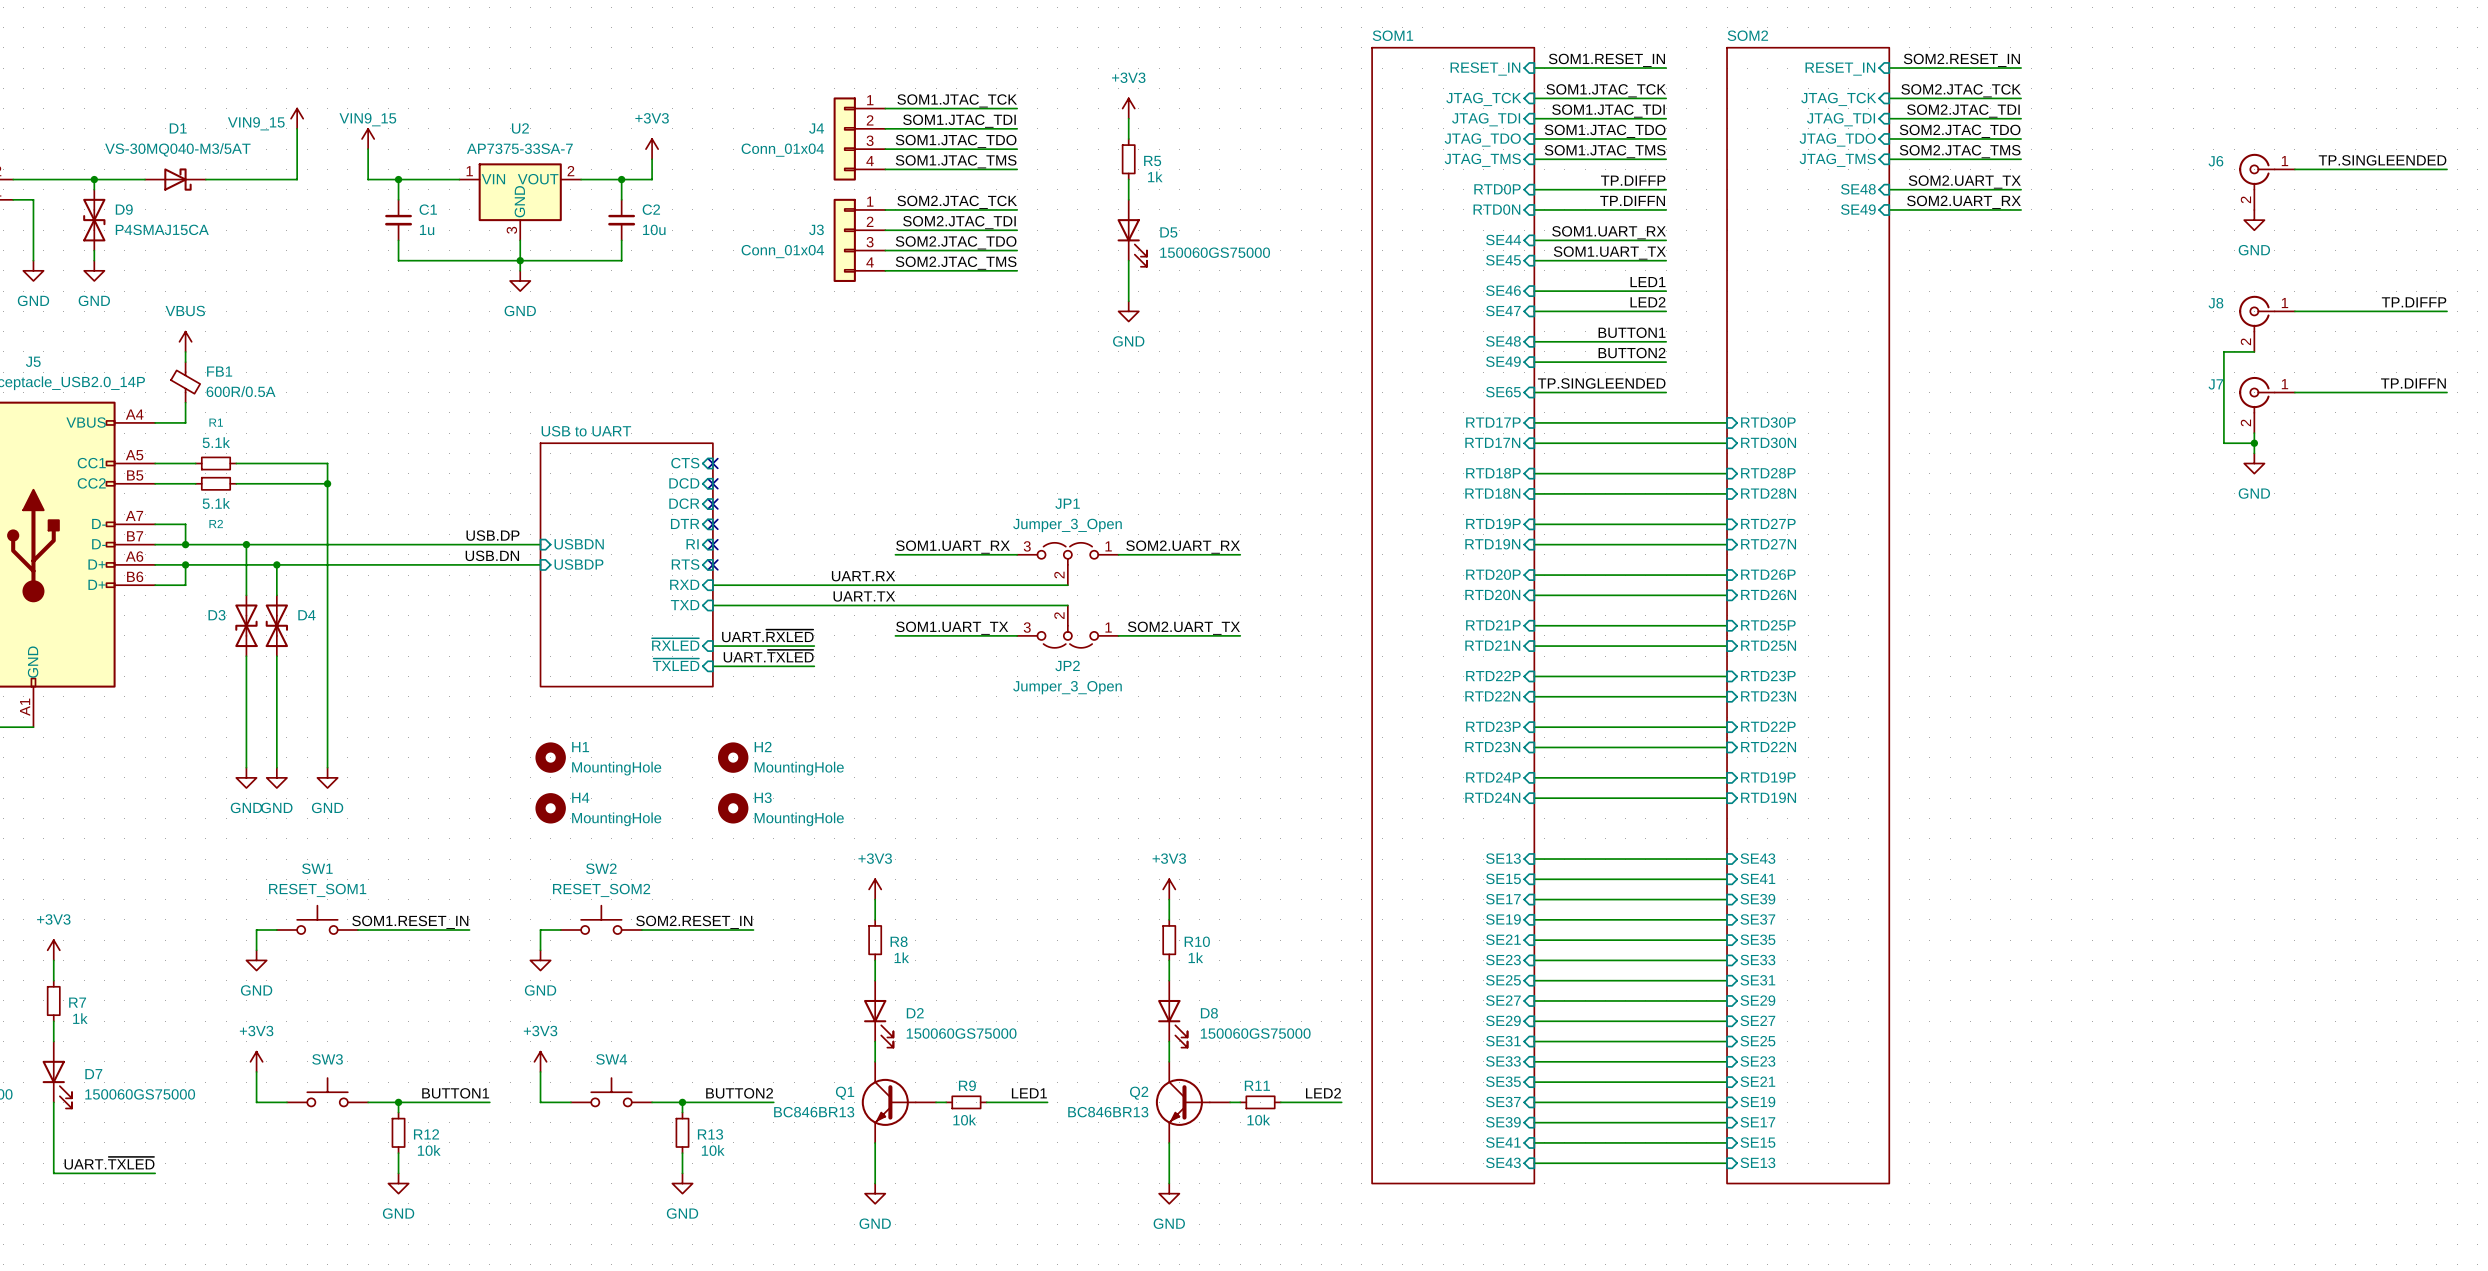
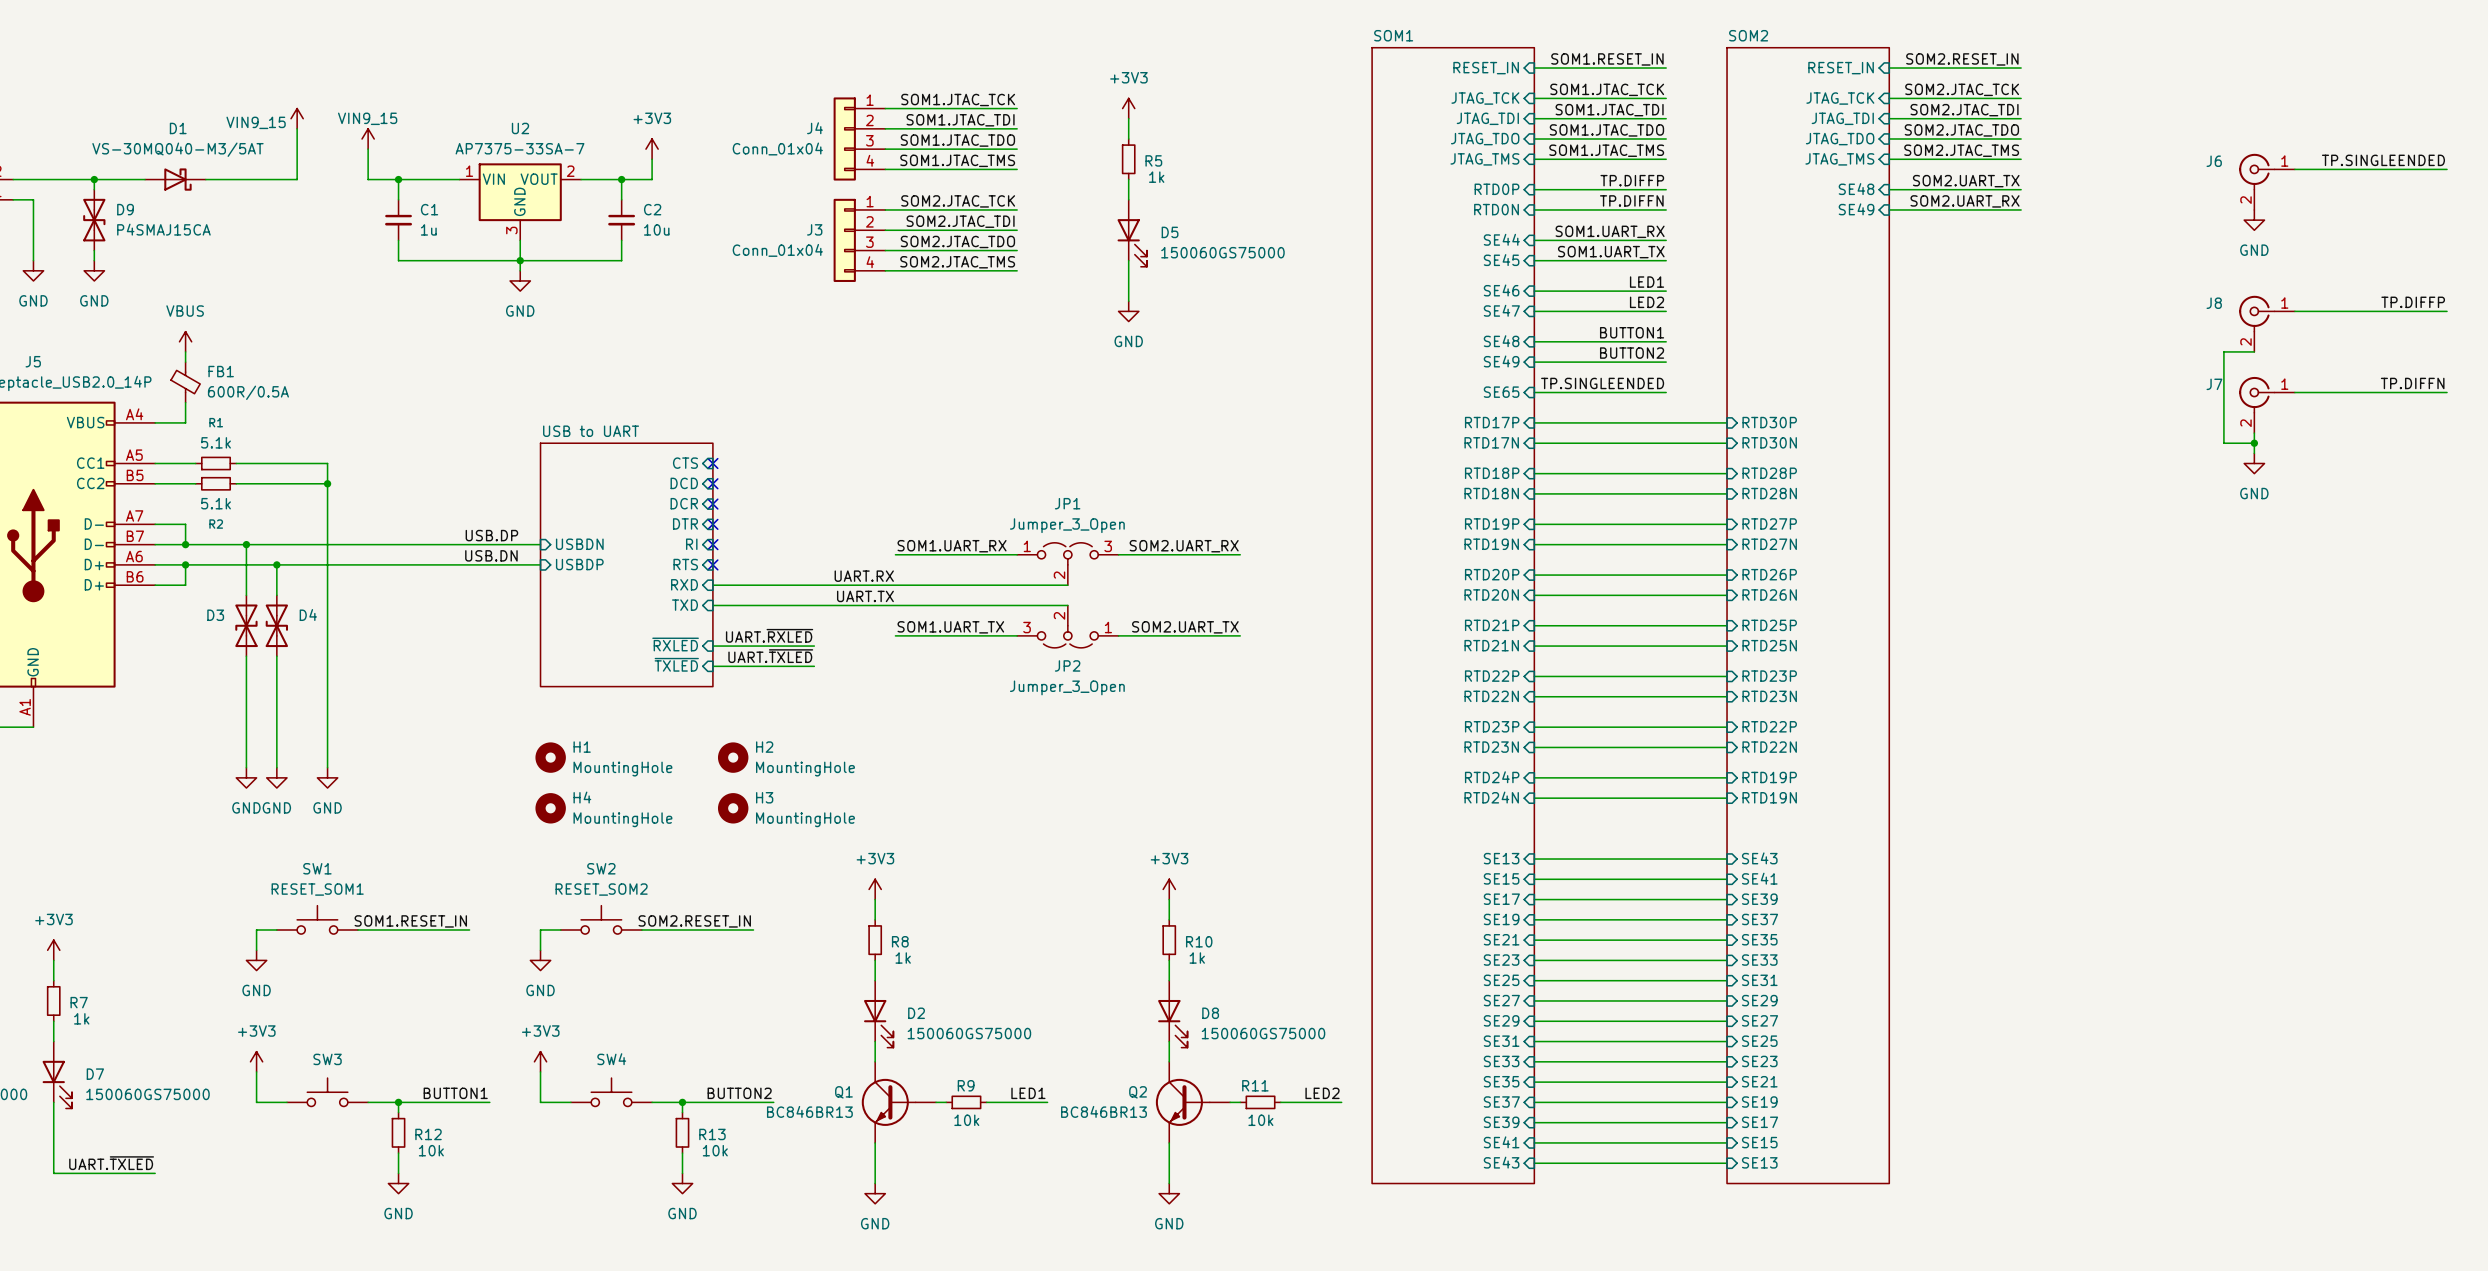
JP1 flip: as is (1067, 553) -> left-right (1067, 553)

